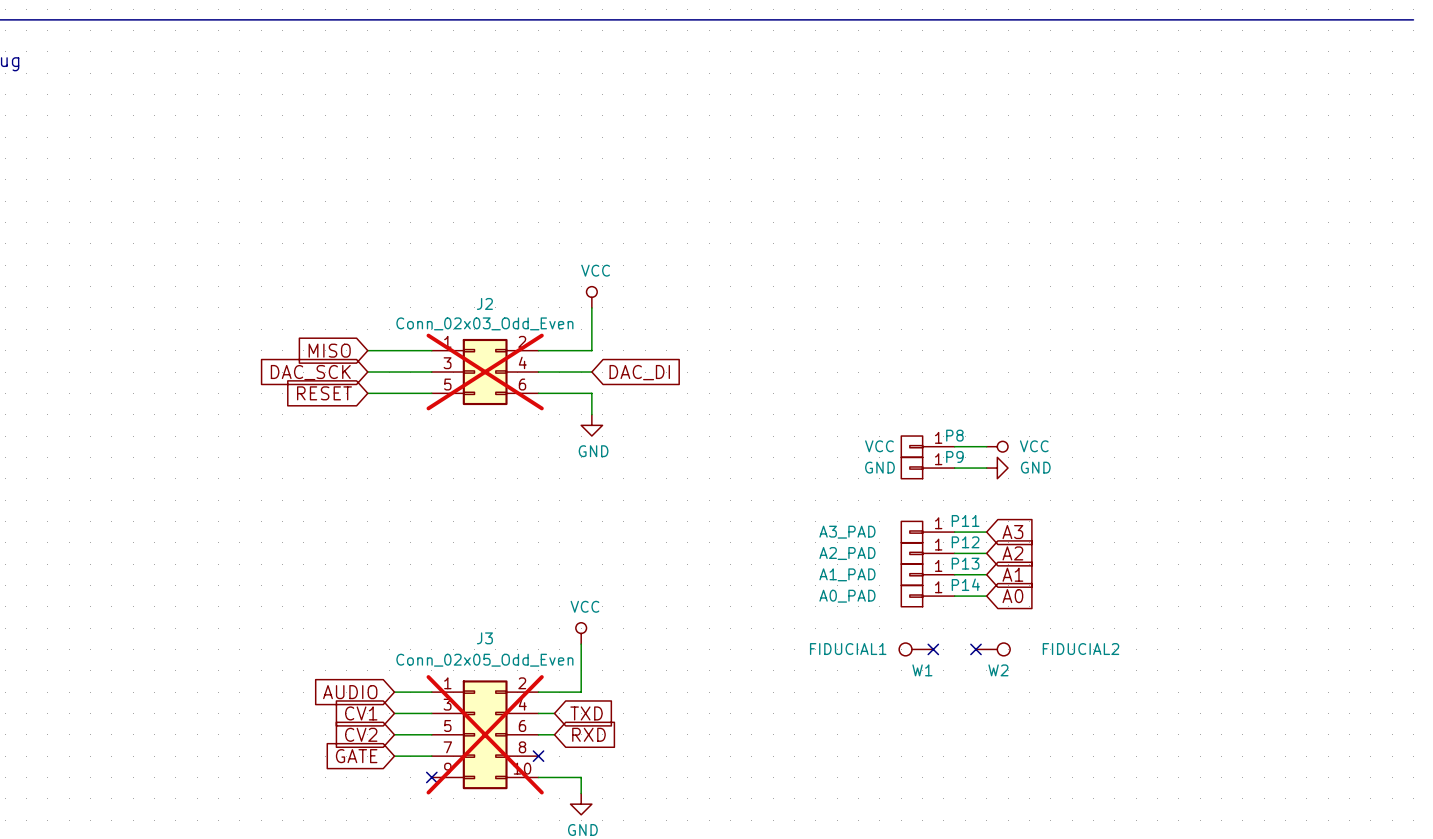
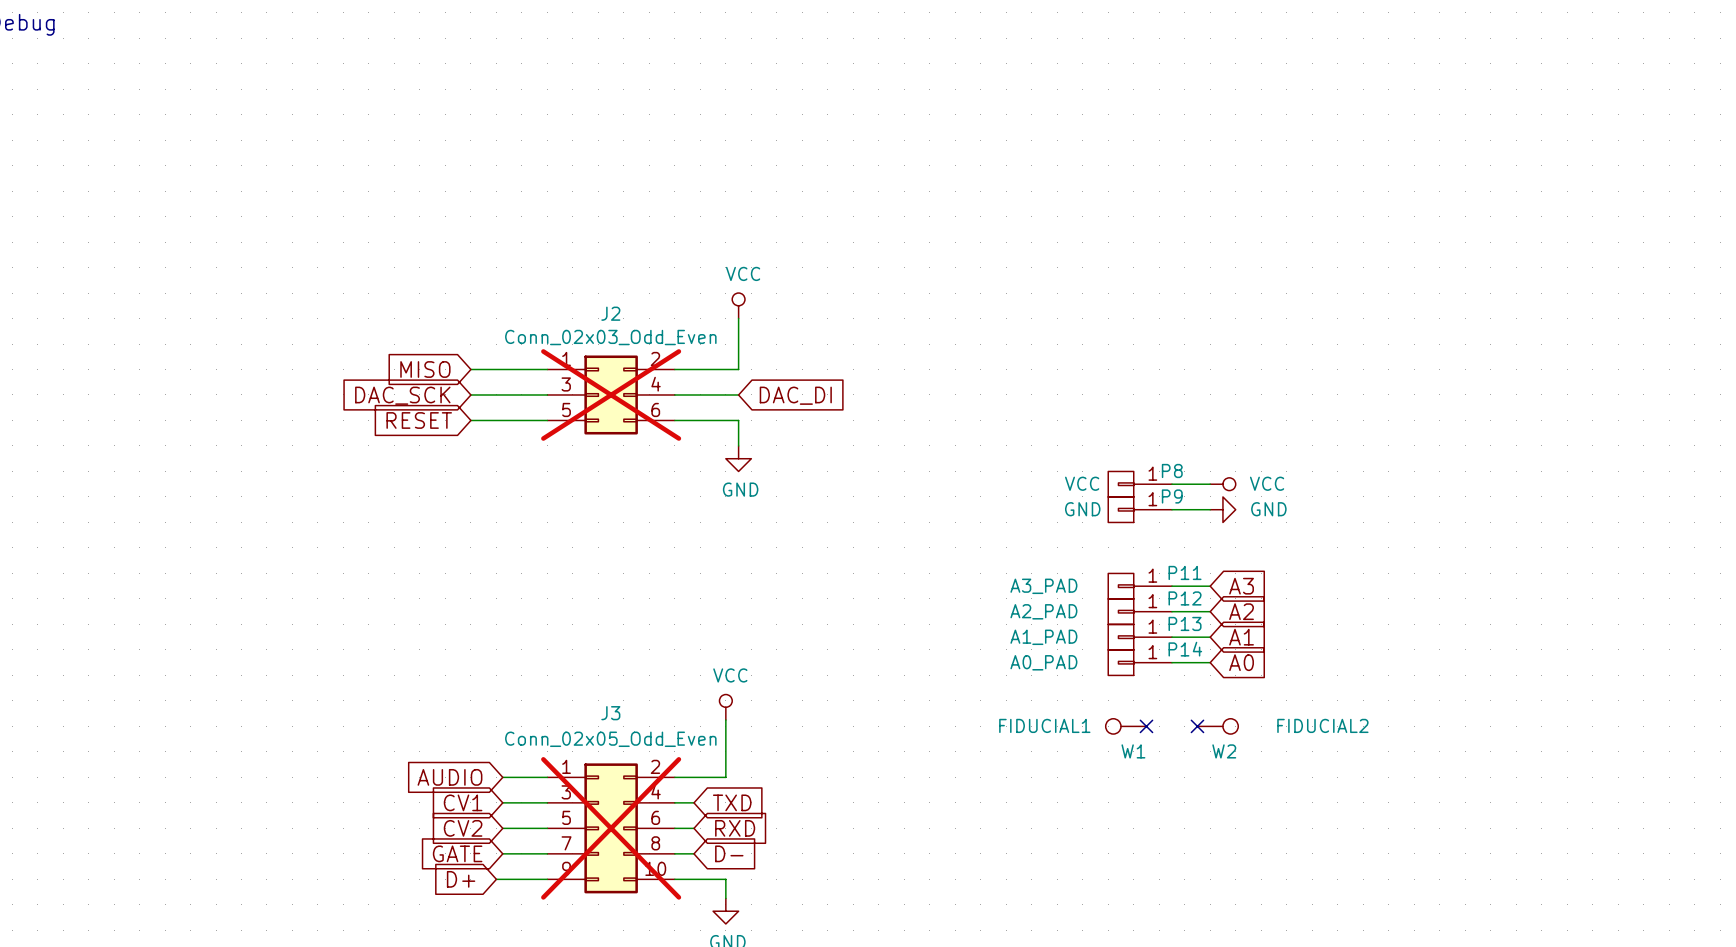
wire: none -> (674, 853) (693, 853)
no-connect mark: (538, 756) -> none
global label: none -> D- (729, 853)
global label: none -> D+ (461, 879)
wire: none -> (496, 879) (547, 879)
no-connect mark: (431, 777) -> none

